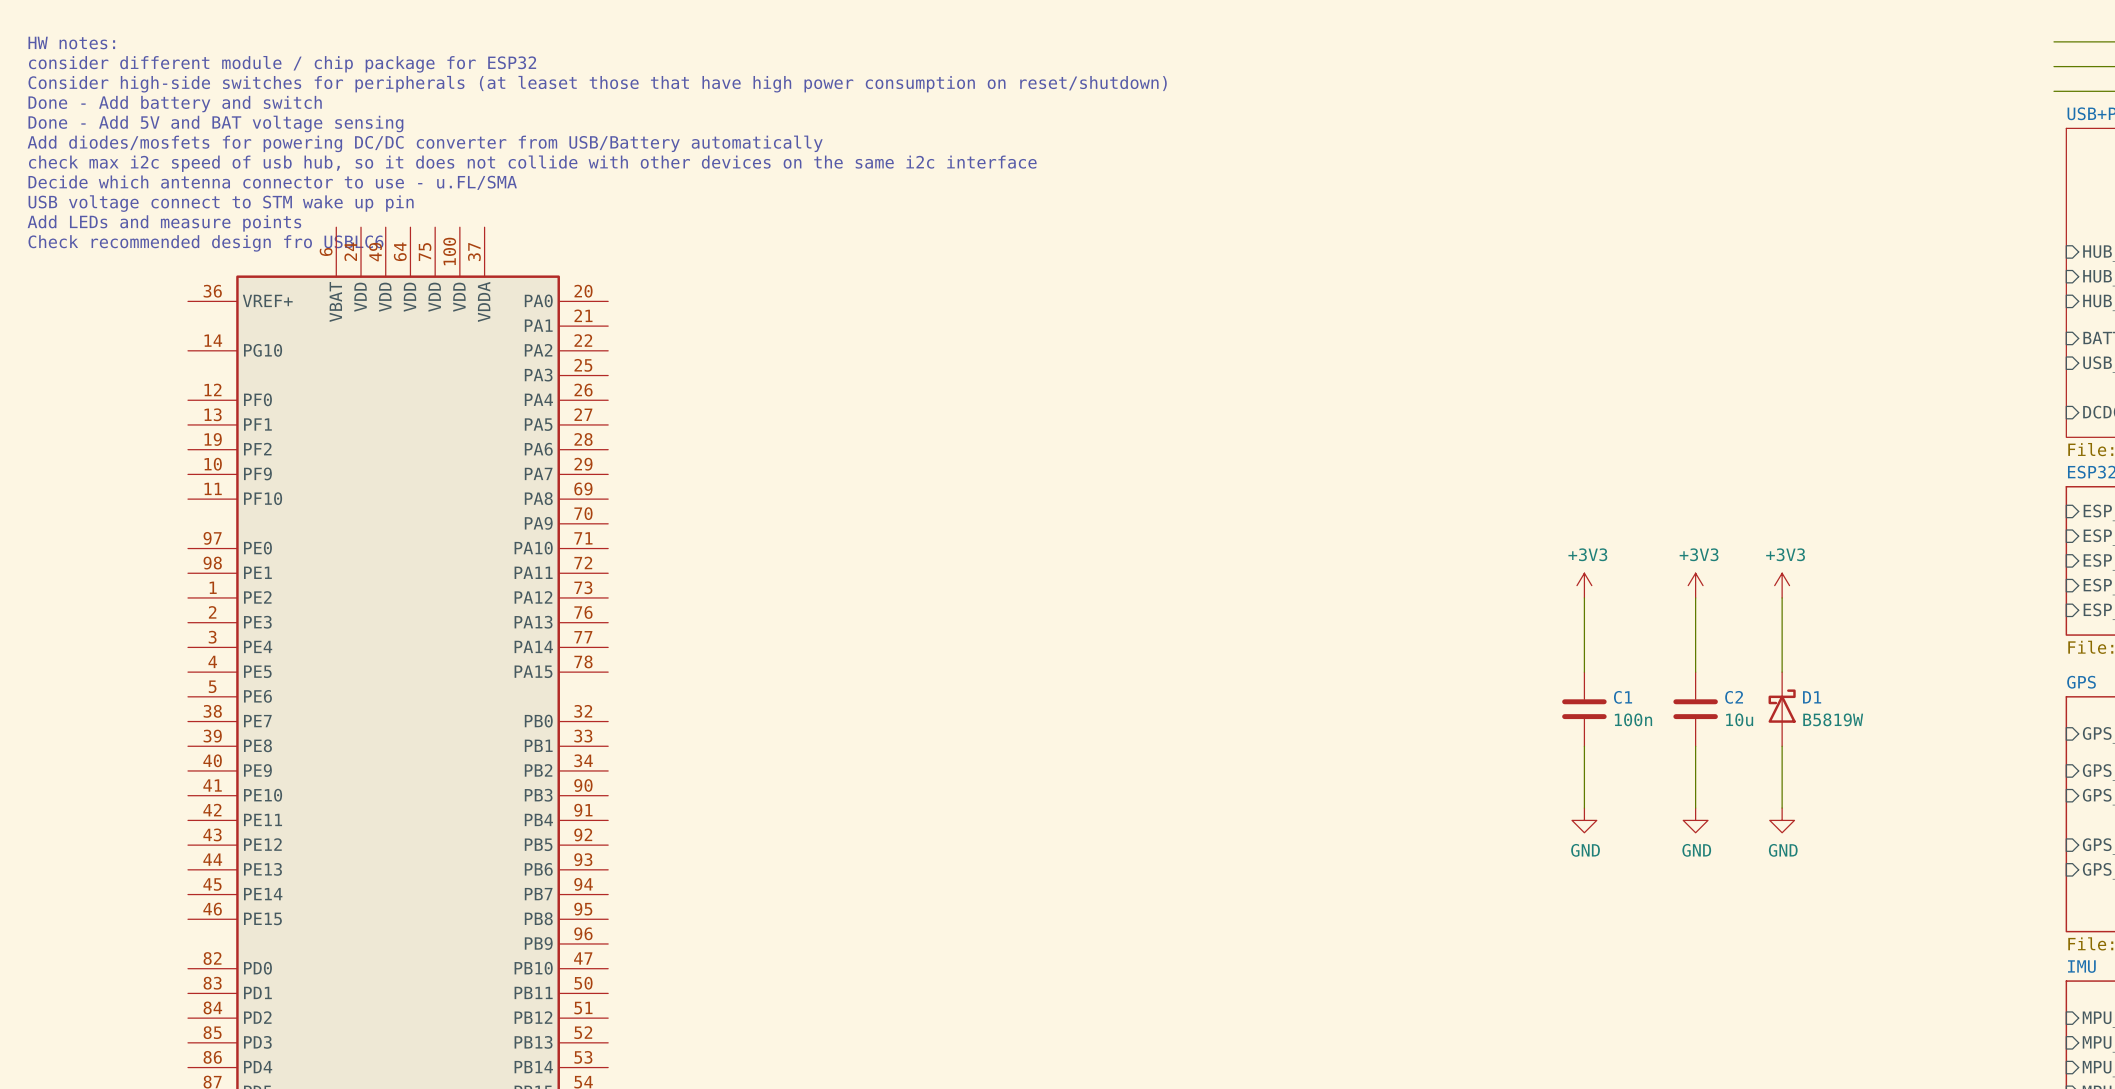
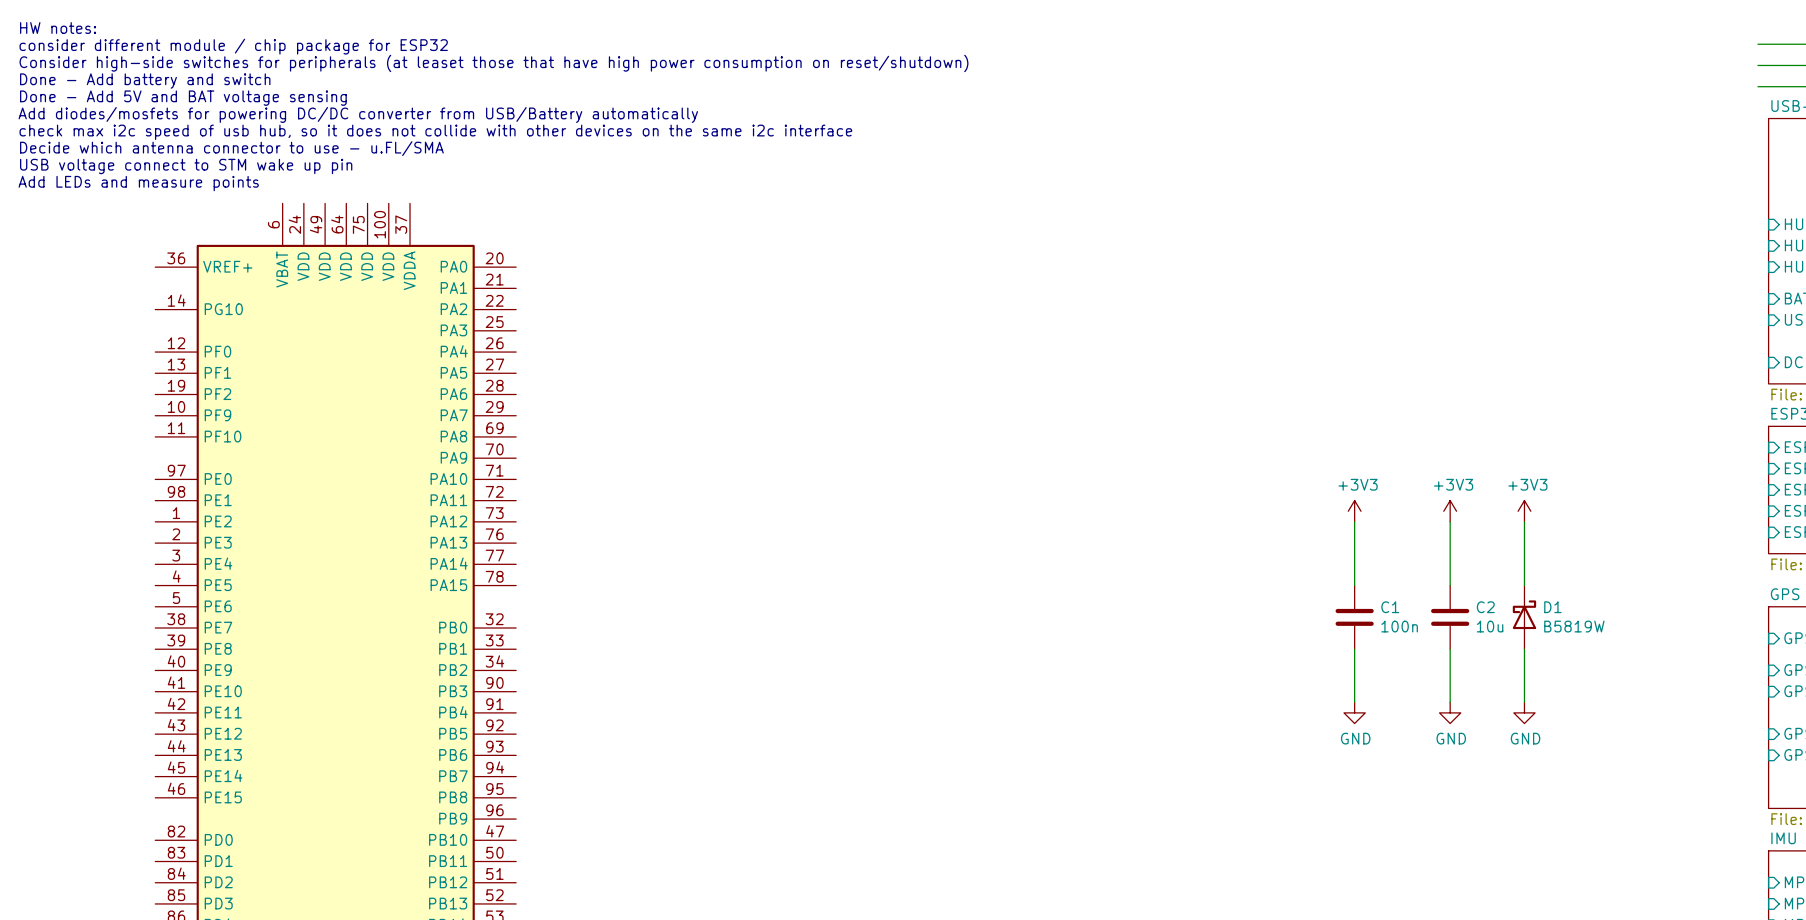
text: none -> HW notes: (58, 28)
text: HW notes: (71, 43) -> consider different module / chip package for ESP32 (233, 46)
text: consider different module / chip package for ESP32 (282, 64) -> Consider high-side switches for peripherals (at leaset those that have high power consumption on reset/shutdown) (493, 63)
text: Consider high-side switches for peripherals (at leaset those that have high power consumption on reset/shutdown) (597, 84) -> Done - Add battery and switch (145, 81)
text: Done - Add battery and switch (175, 104) -> Done - Add 5V and BAT voltage sensing (183, 98)
text: Done - Add 5V and BAT voltage sensing (215, 123) -> Add diodes/mosfets for powering DC/DC converter from USB/Battery automatically (358, 114)
text: Add diodes/mosfets for powering DC/DC converter from USB/Battery automatically (425, 143) -> check max i2c speed of usb hub, so it does not collide with other devices on the same i2c interface (435, 132)
text: check max i2c speed of usb hub, so it does not collide with other devices on the same i2c interface (532, 163) -> Decide which antenna connector to use - u.FL/SMA (231, 148)
text: Decide which antenna connector to use - u.FL/SMA (272, 182) -> USB voltage connect to STM wake up pin (186, 166)
text: USB voltage connect to STM wake up pin (221, 203) -> Add LEDs and measure points (138, 183)
text: Add LEDs and measure points (164, 223) -> none
text: Check recommended design fro USBLC6 (205, 243) -> none

